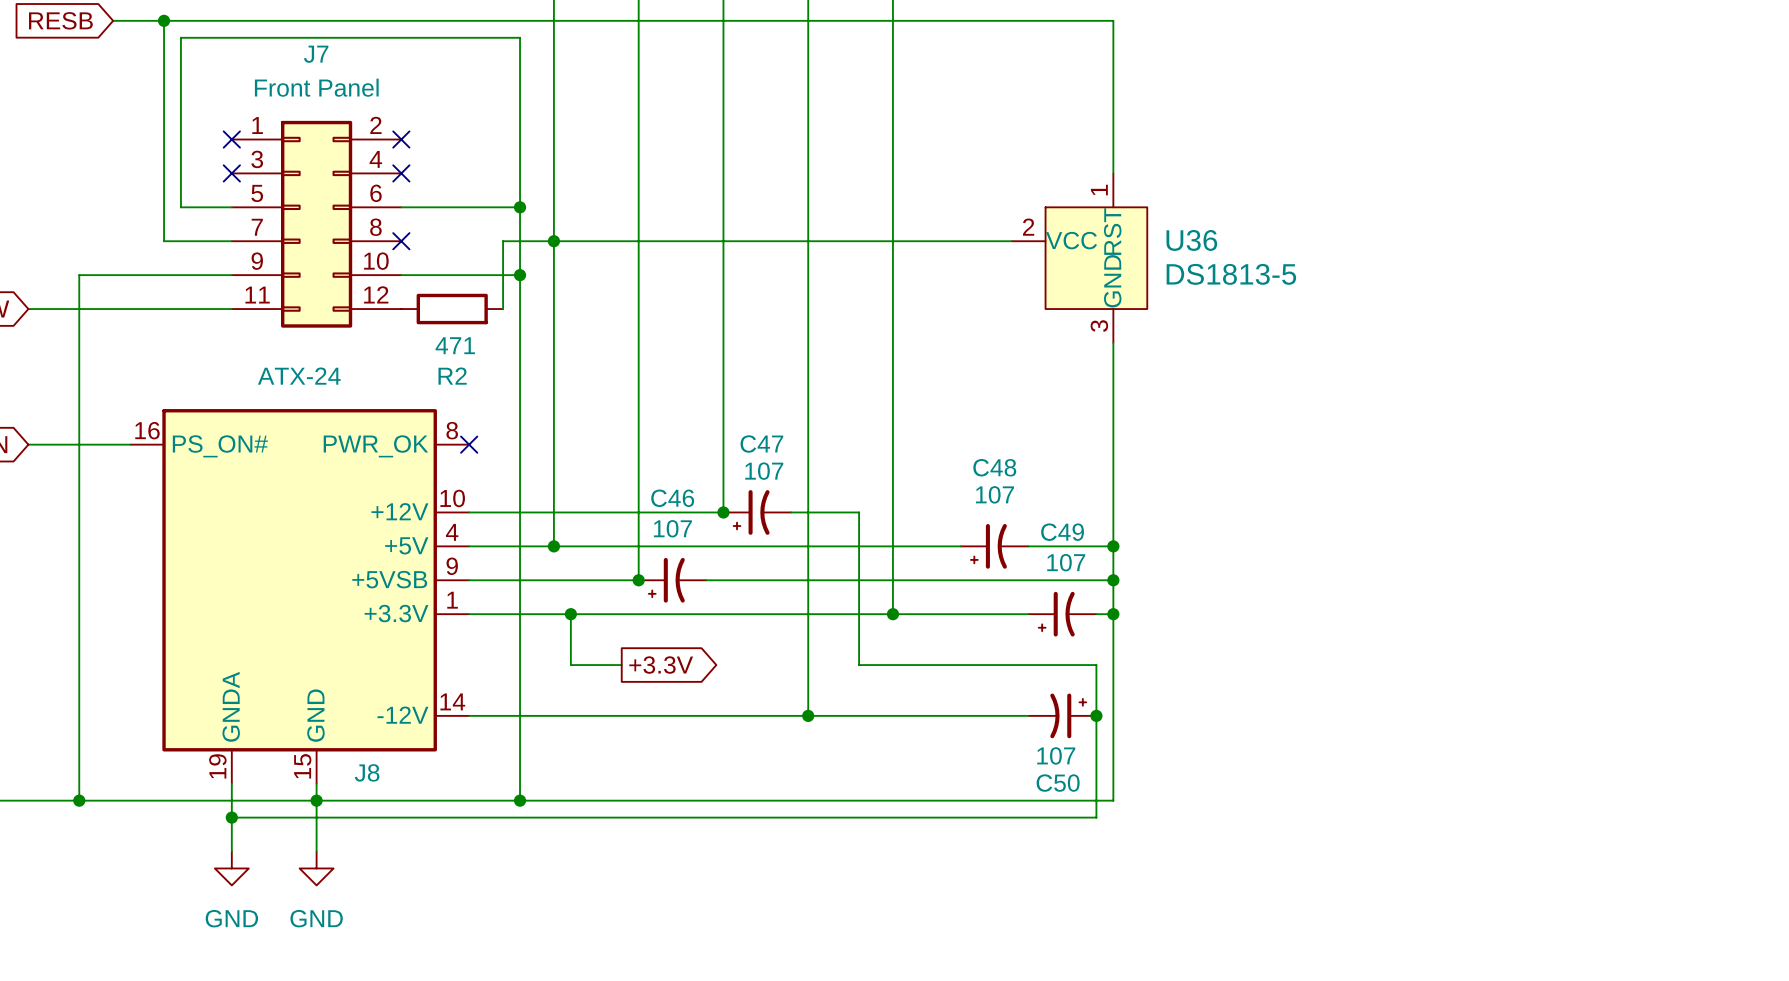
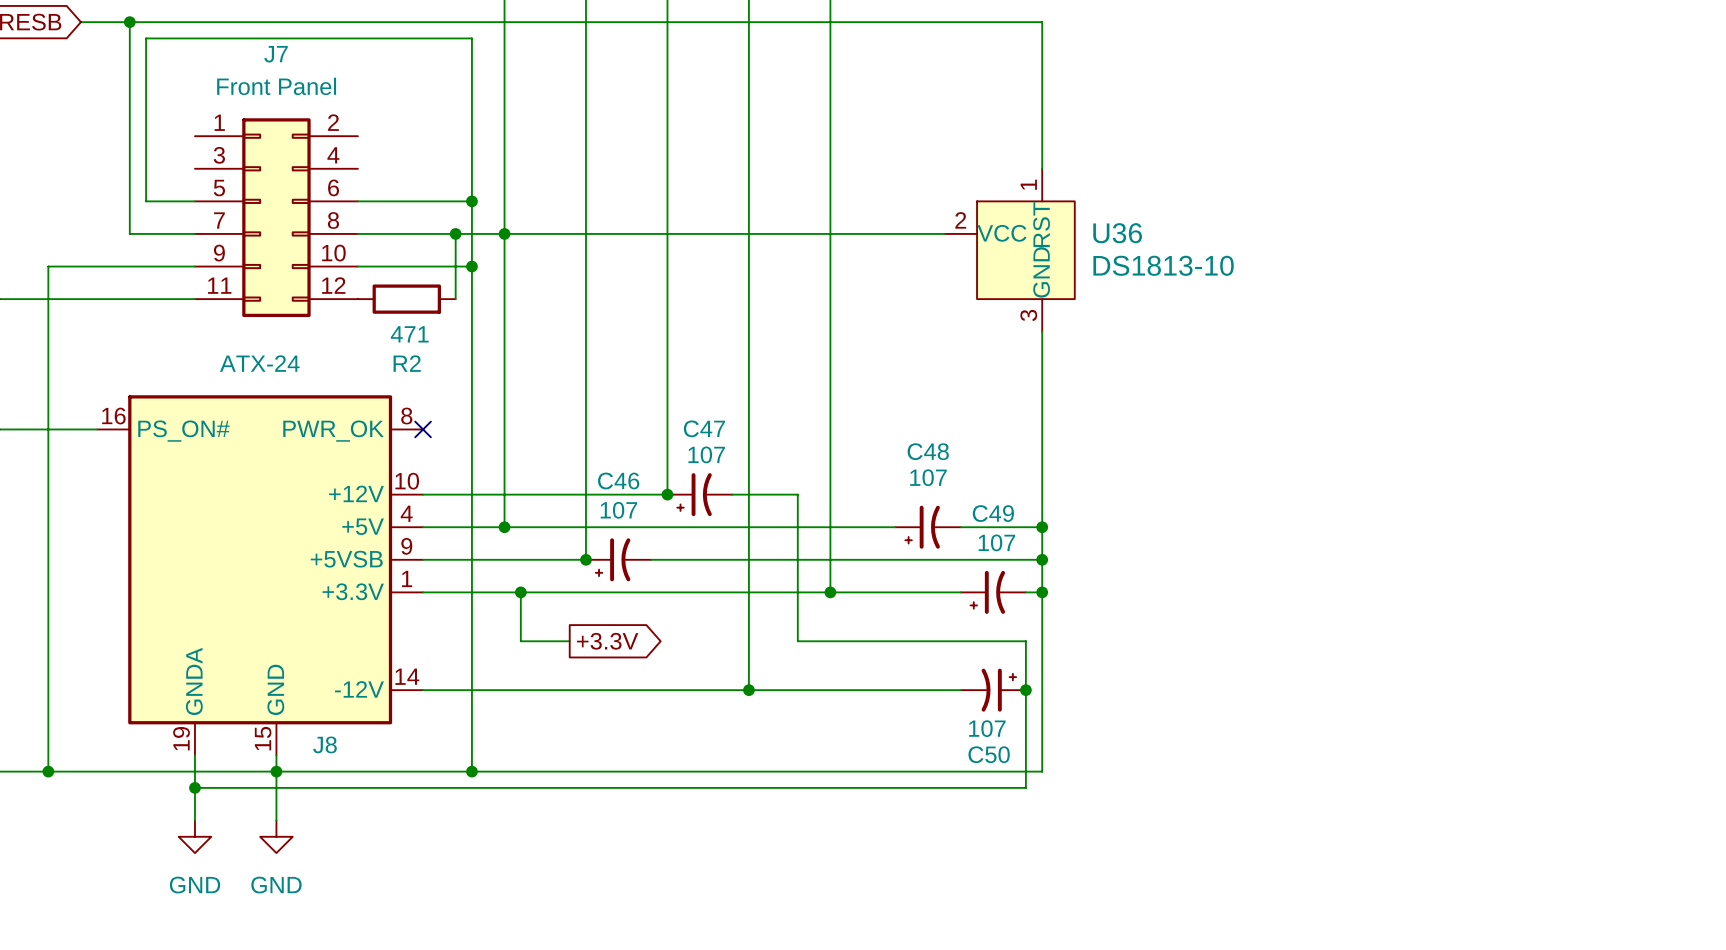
no-connect mark: (231, 139) -> none
no-connect mark: (401, 139) -> none
no-connect mark: (231, 173) -> none
no-connect mark: (401, 173) -> none
wire: none -> (357, 233) (455, 233)
no-connect mark: (401, 241) -> none
junction: none -> (455, 233)
U36 value: DS1813-5 (1231, 274) -> DS1813-10 (1163, 265)

